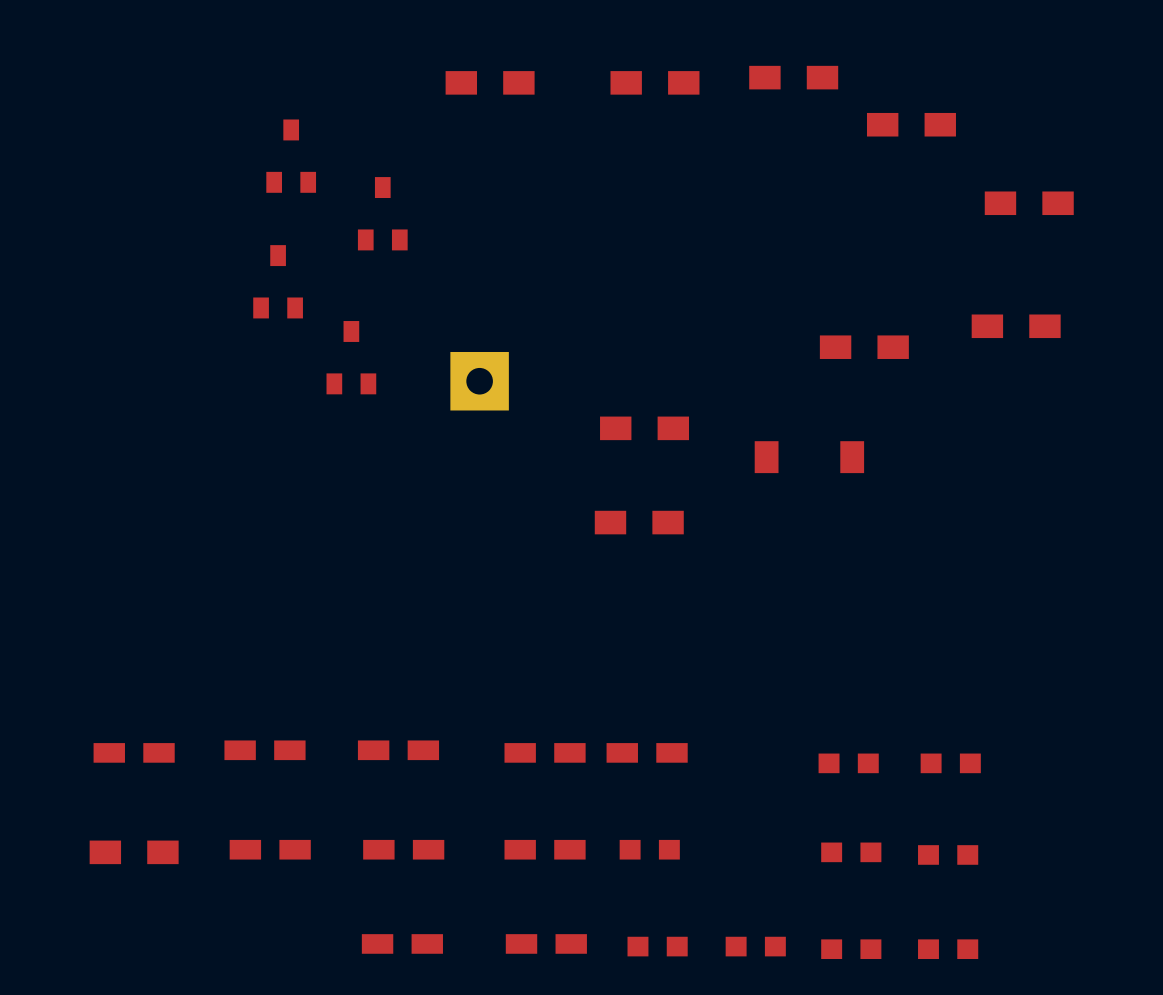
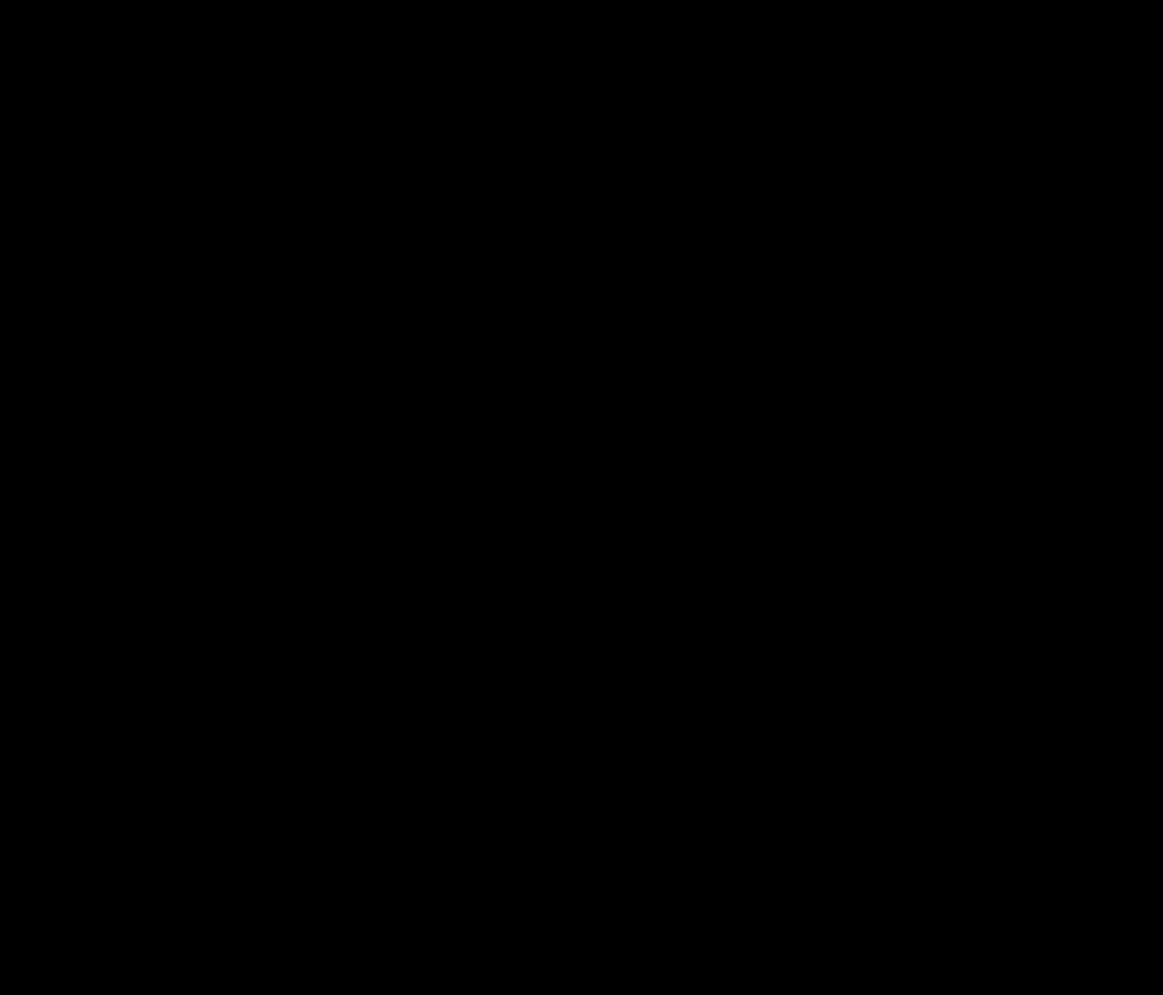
part: (793, 77) -> none
part: (490, 82) -> none
part: (654, 82) -> none
part: (911, 124) -> none
part: (291, 156) -> none
part: (1029, 203) -> none
part: (382, 213) -> none
part: (278, 281) -> none
part: (1016, 326) -> none
part: (864, 347) -> none
part: (351, 357) -> none
part: (479, 381) -> none
part: (644, 428) -> none
part: (809, 457) -> none
part: (639, 522) -> none
part: (265, 750) -> none
part: (398, 750) -> none
part: (134, 752) -> none
part: (545, 752) -> none
part: (647, 752) -> none
part: (848, 763) -> none
part: (950, 763) -> none
part: (270, 849) -> none
part: (403, 849) -> none
part: (545, 849) -> none
part: (649, 849) -> none
part: (134, 852) -> none
part: (851, 852) -> none
part: (948, 854) -> none
part: (402, 943) -> none
part: (546, 943) -> none
part: (657, 946) -> none
part: (755, 946) -> none
part: (851, 949) -> none
part: (948, 949) -> none

